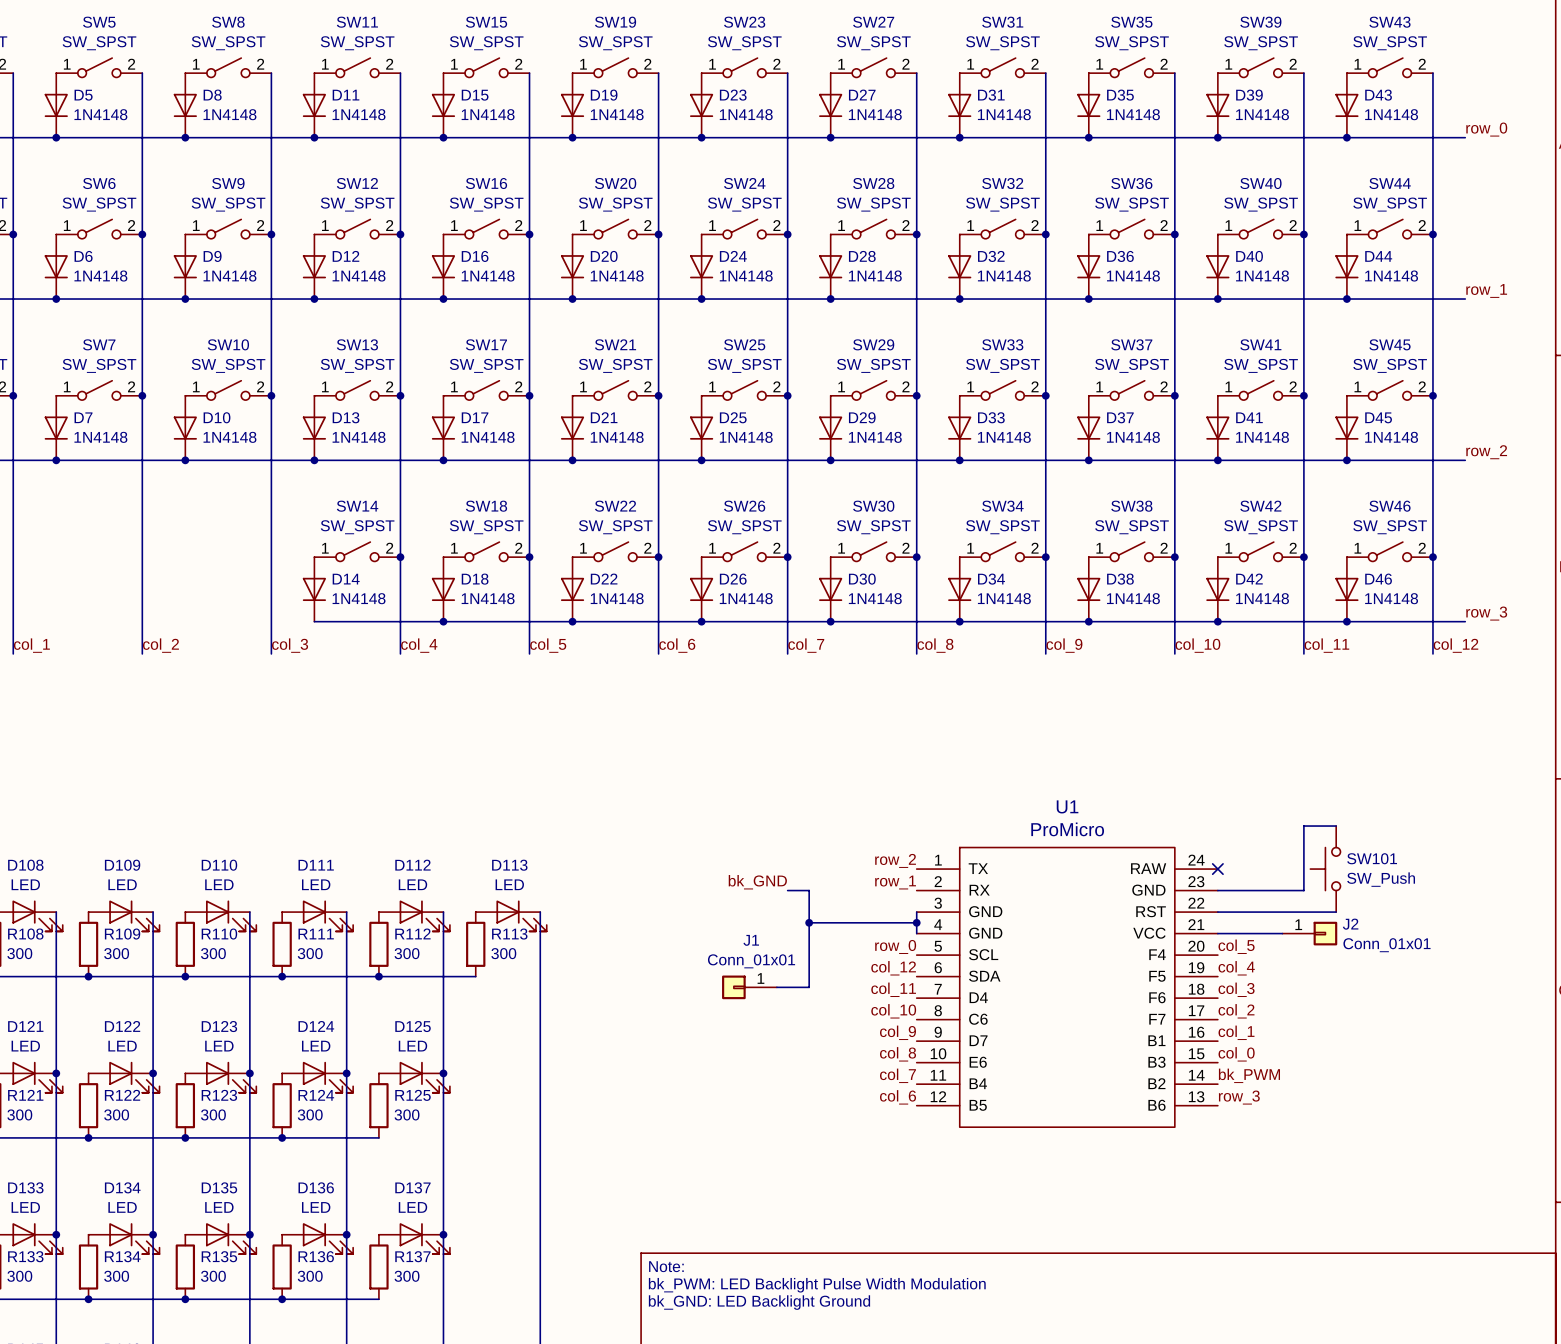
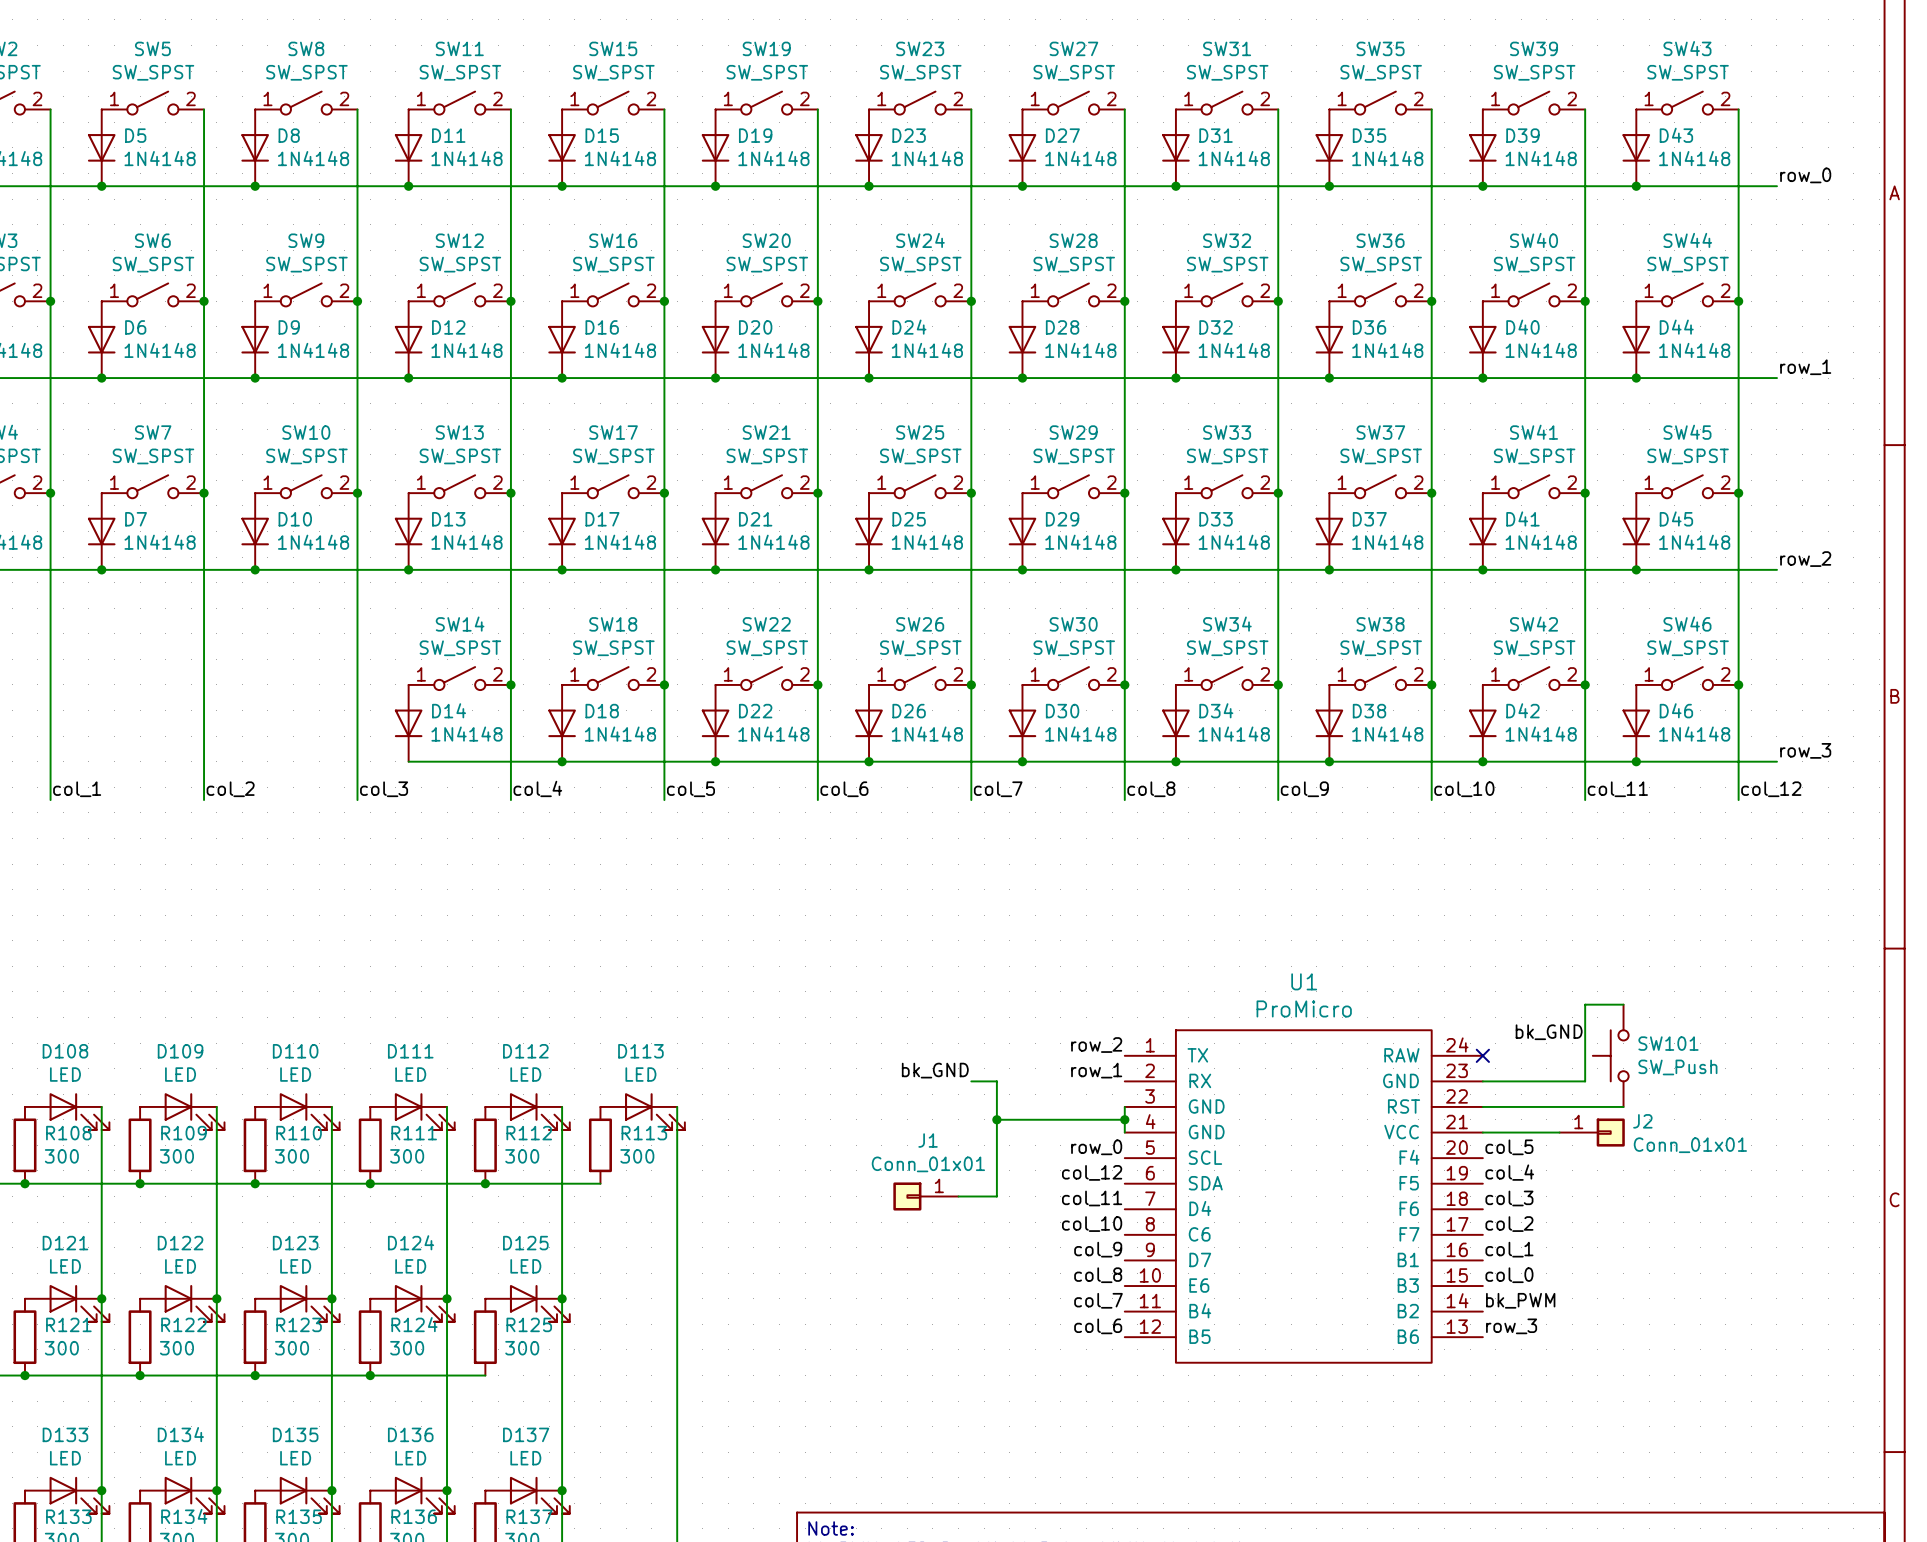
label: none -> bk_GND (1549, 1032)

